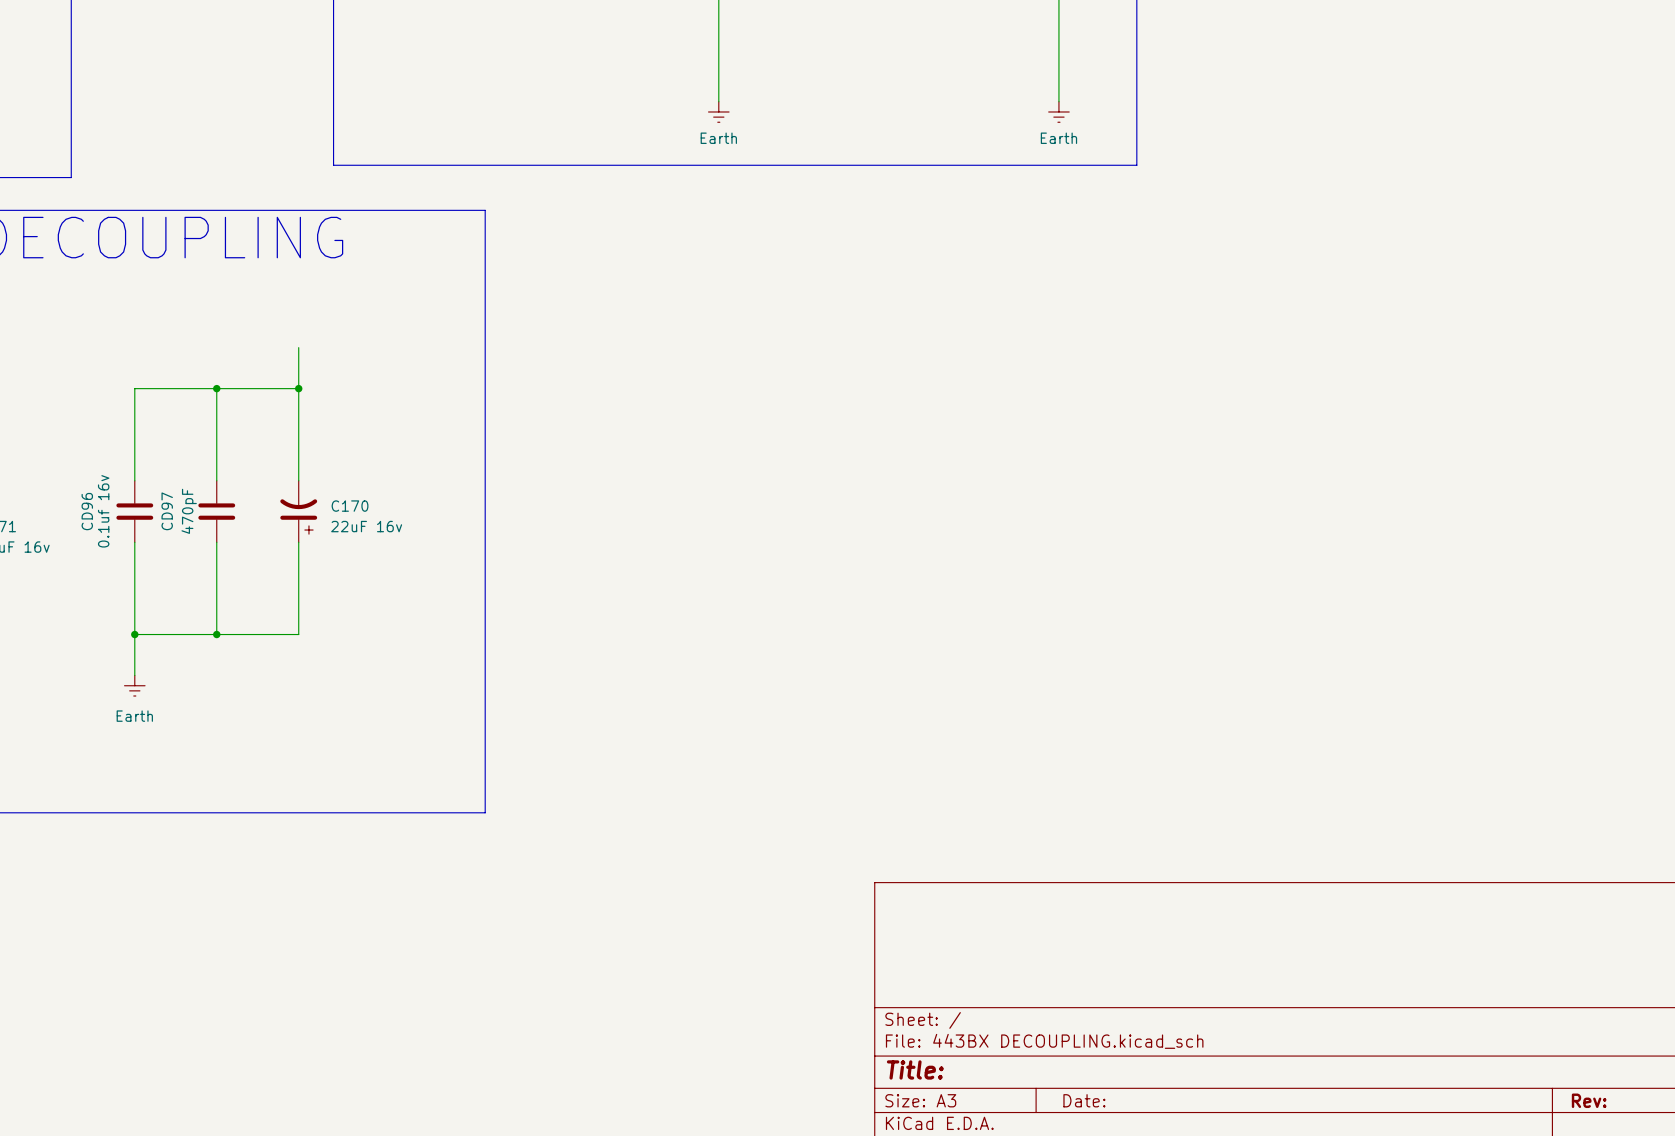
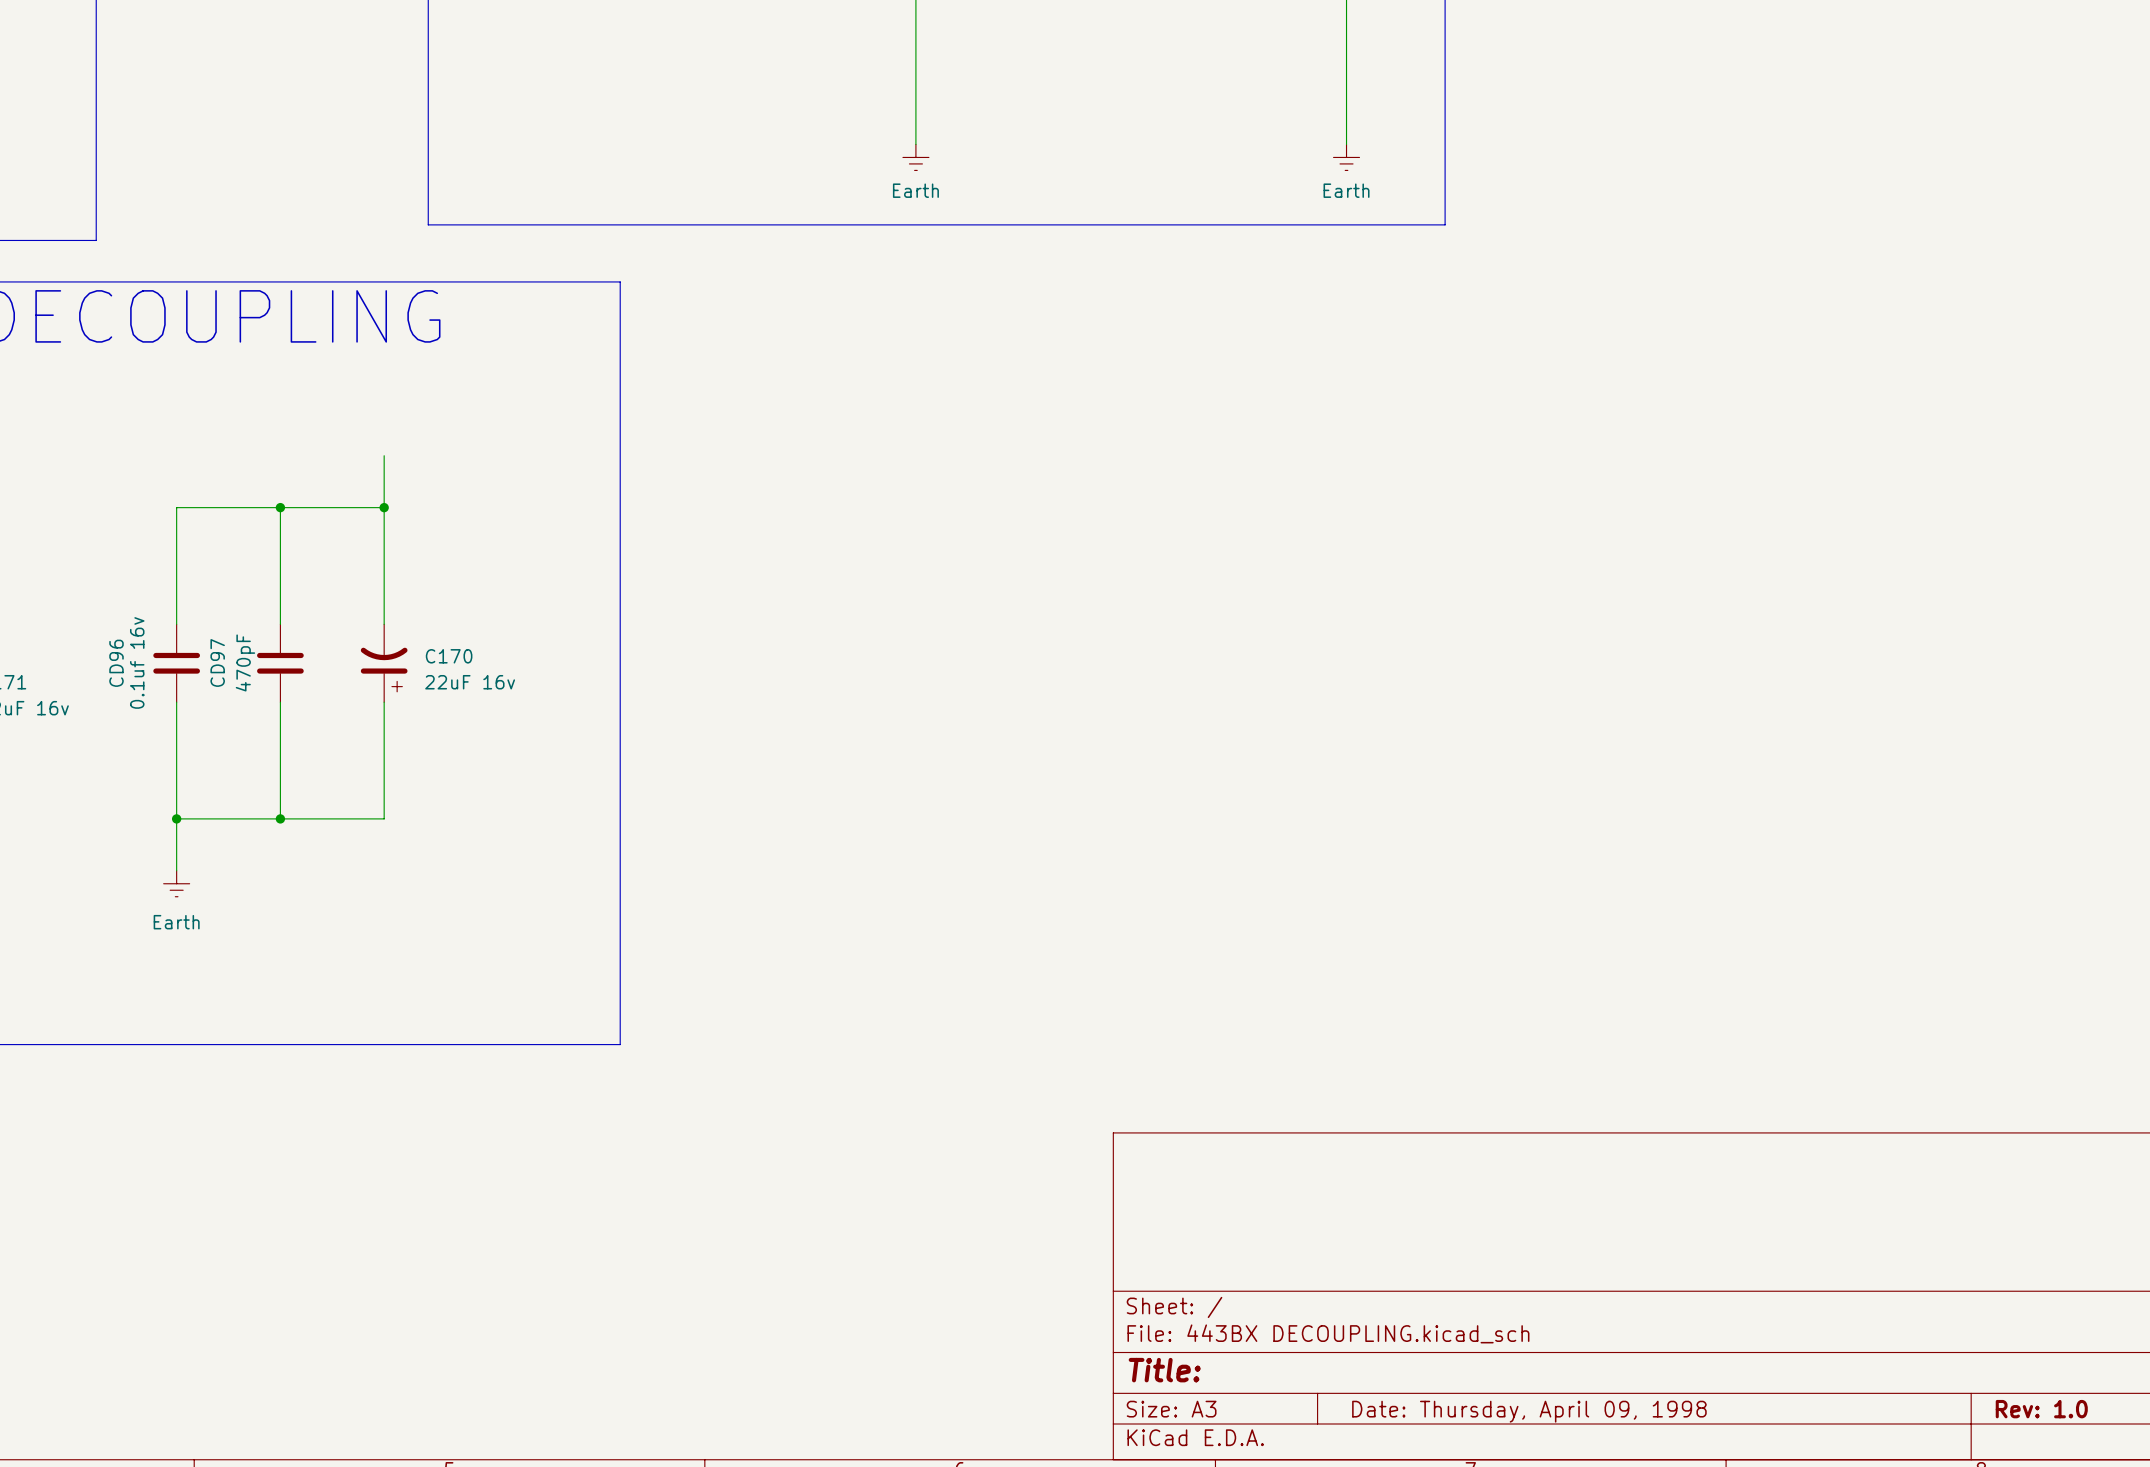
title block: Date: (1084, 1100) -> Date: Thursday, April 09, 1998 (1529, 1411)
title block: Rev: (1589, 1100) -> Rev: 1.0 (2041, 1409)

